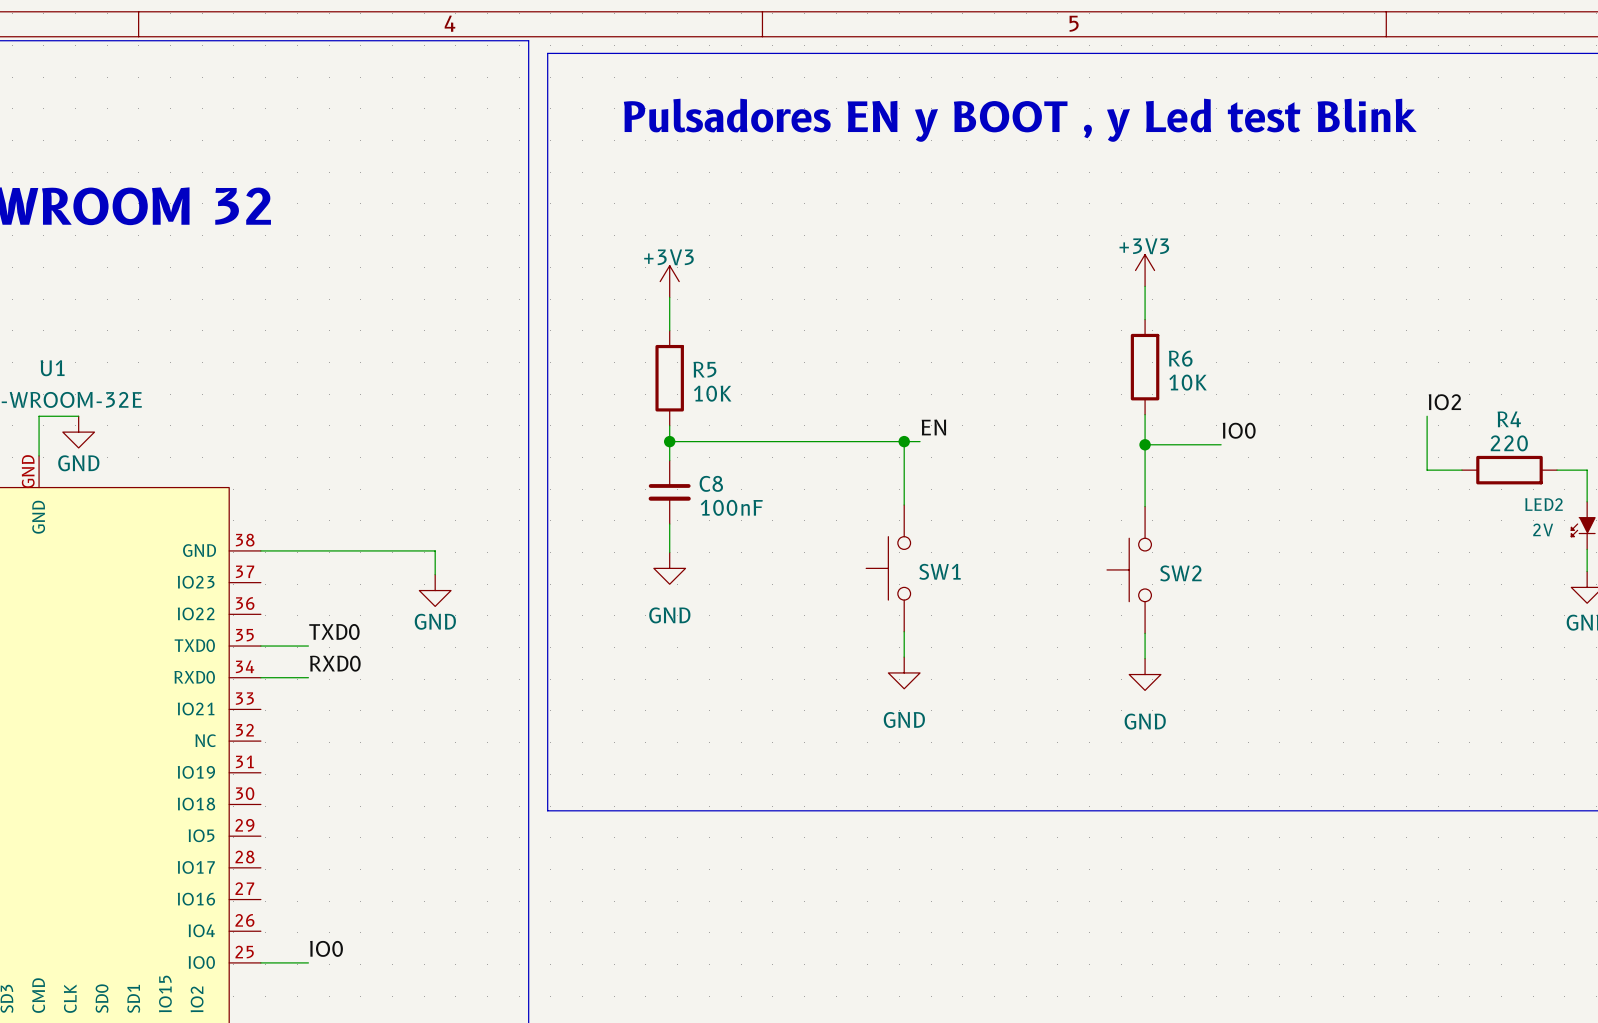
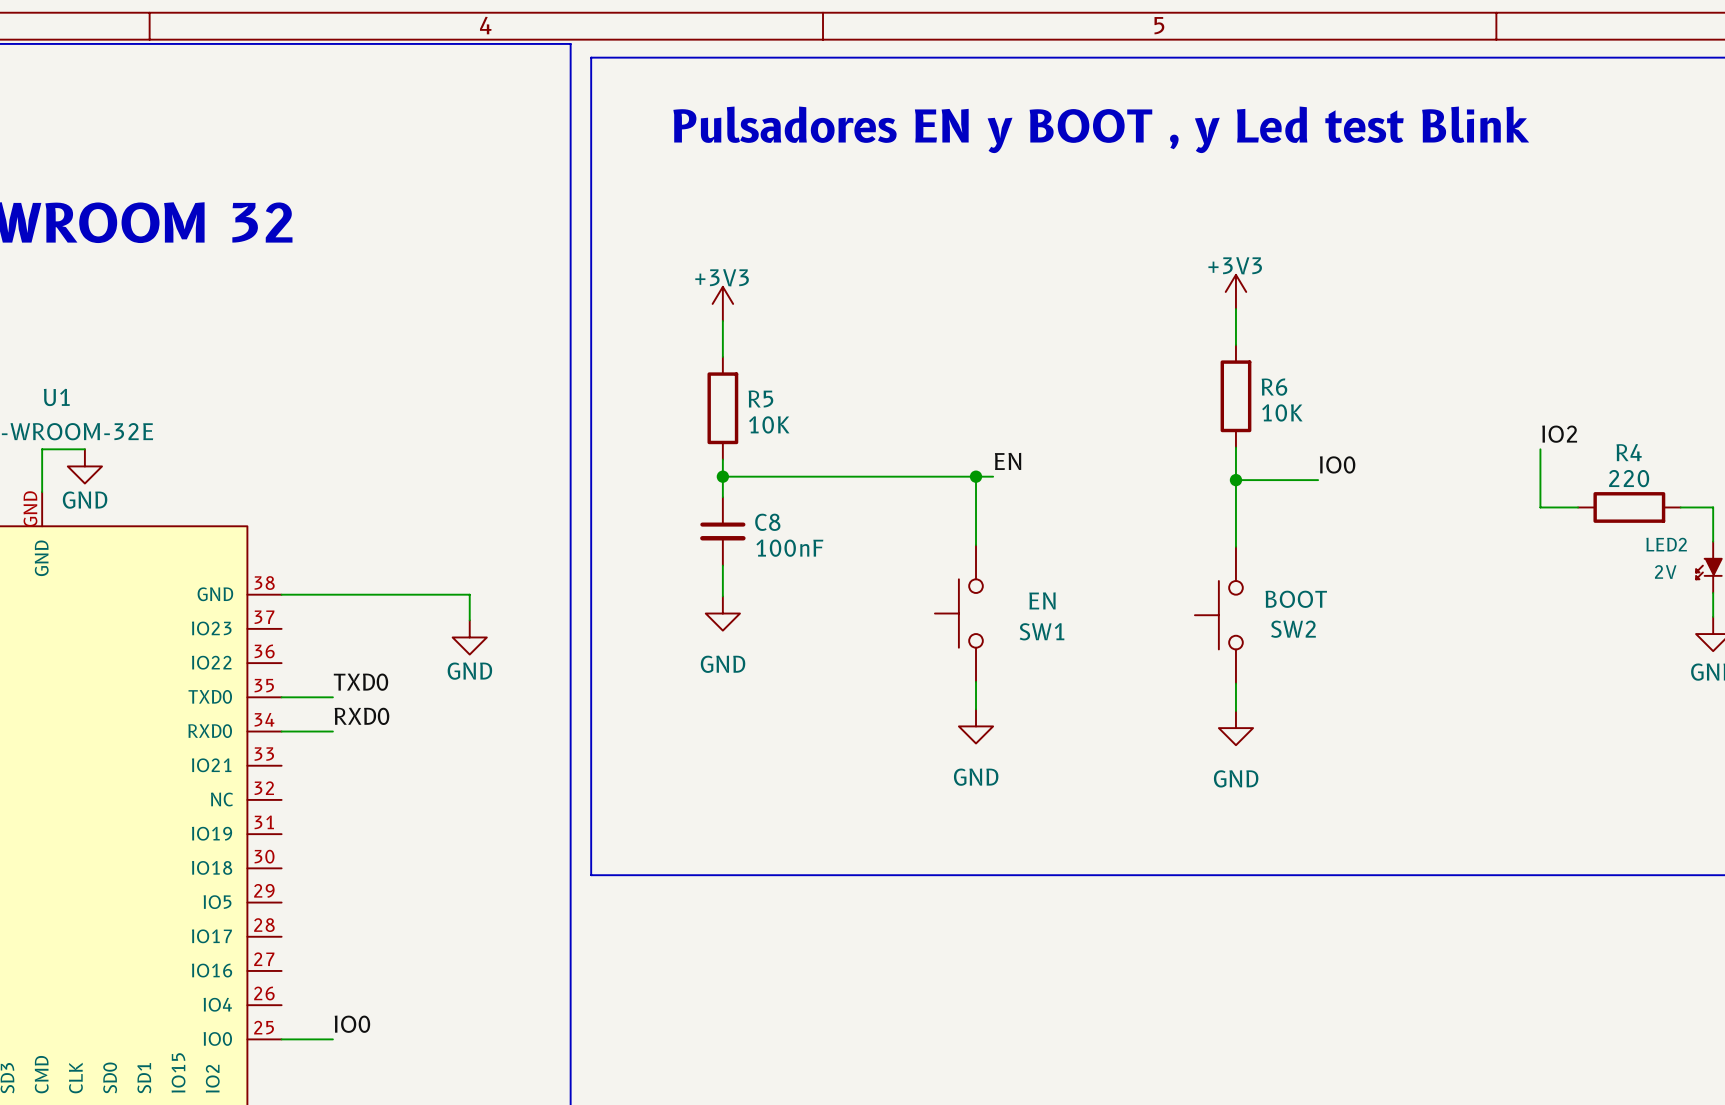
SW2 value: none -> BOOT (1296, 599)
SW1 value: none -> EN (1042, 600)
SW1 name position: SW1 (940, 571) -> SW1 (1042, 631)
SW2 name position: SW2 (1180, 573) -> SW2 (1293, 629)

